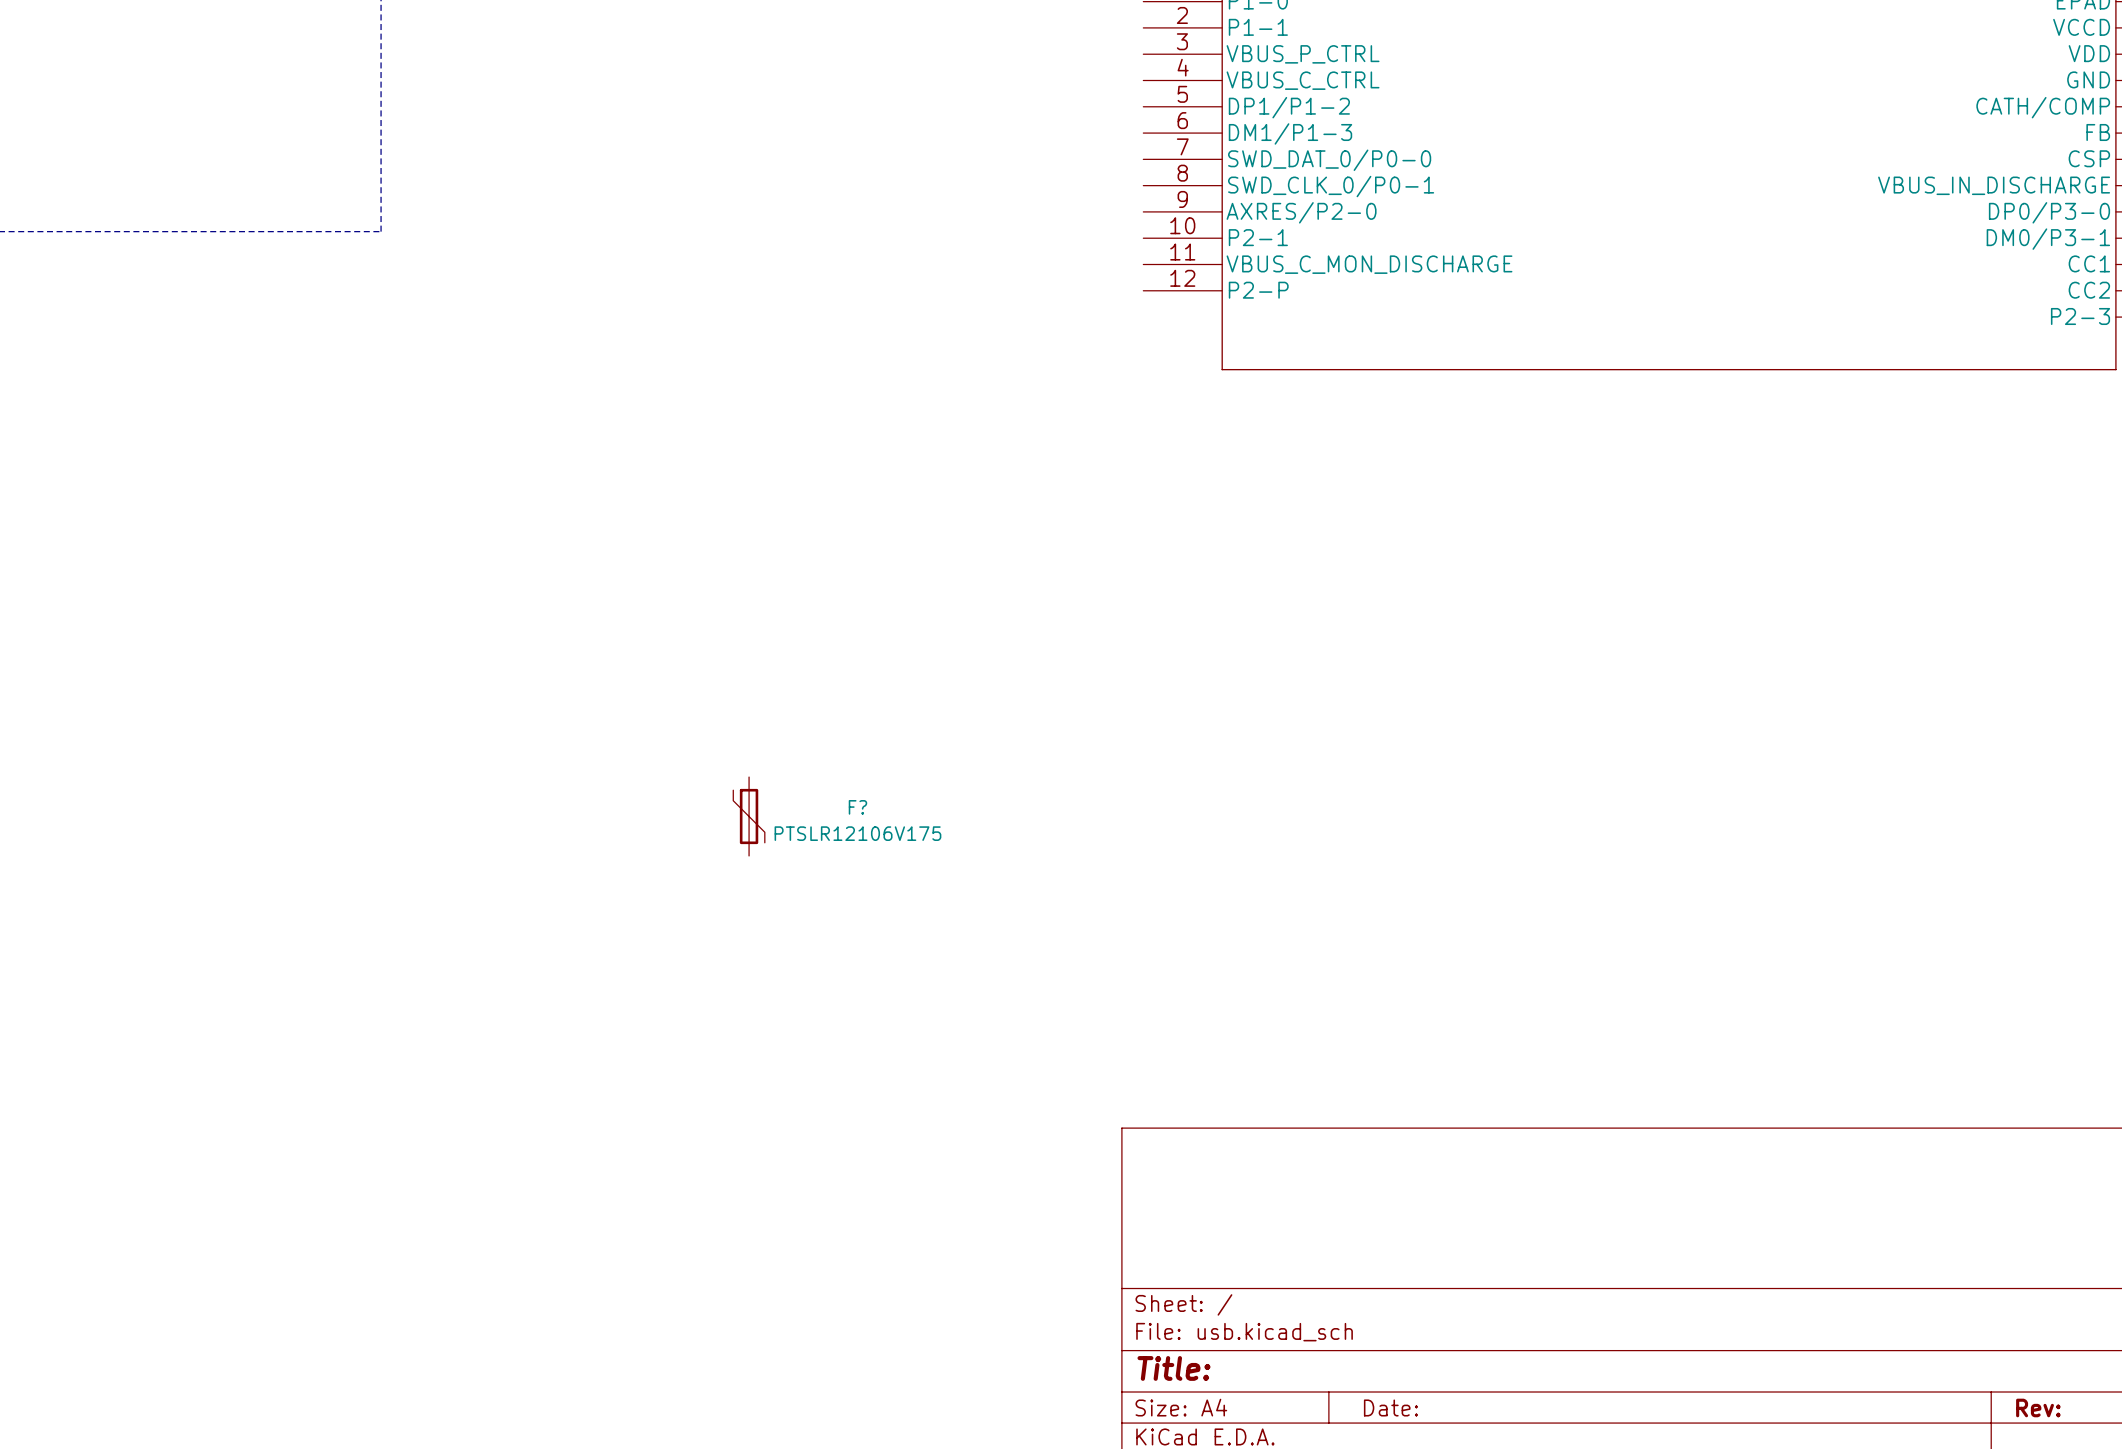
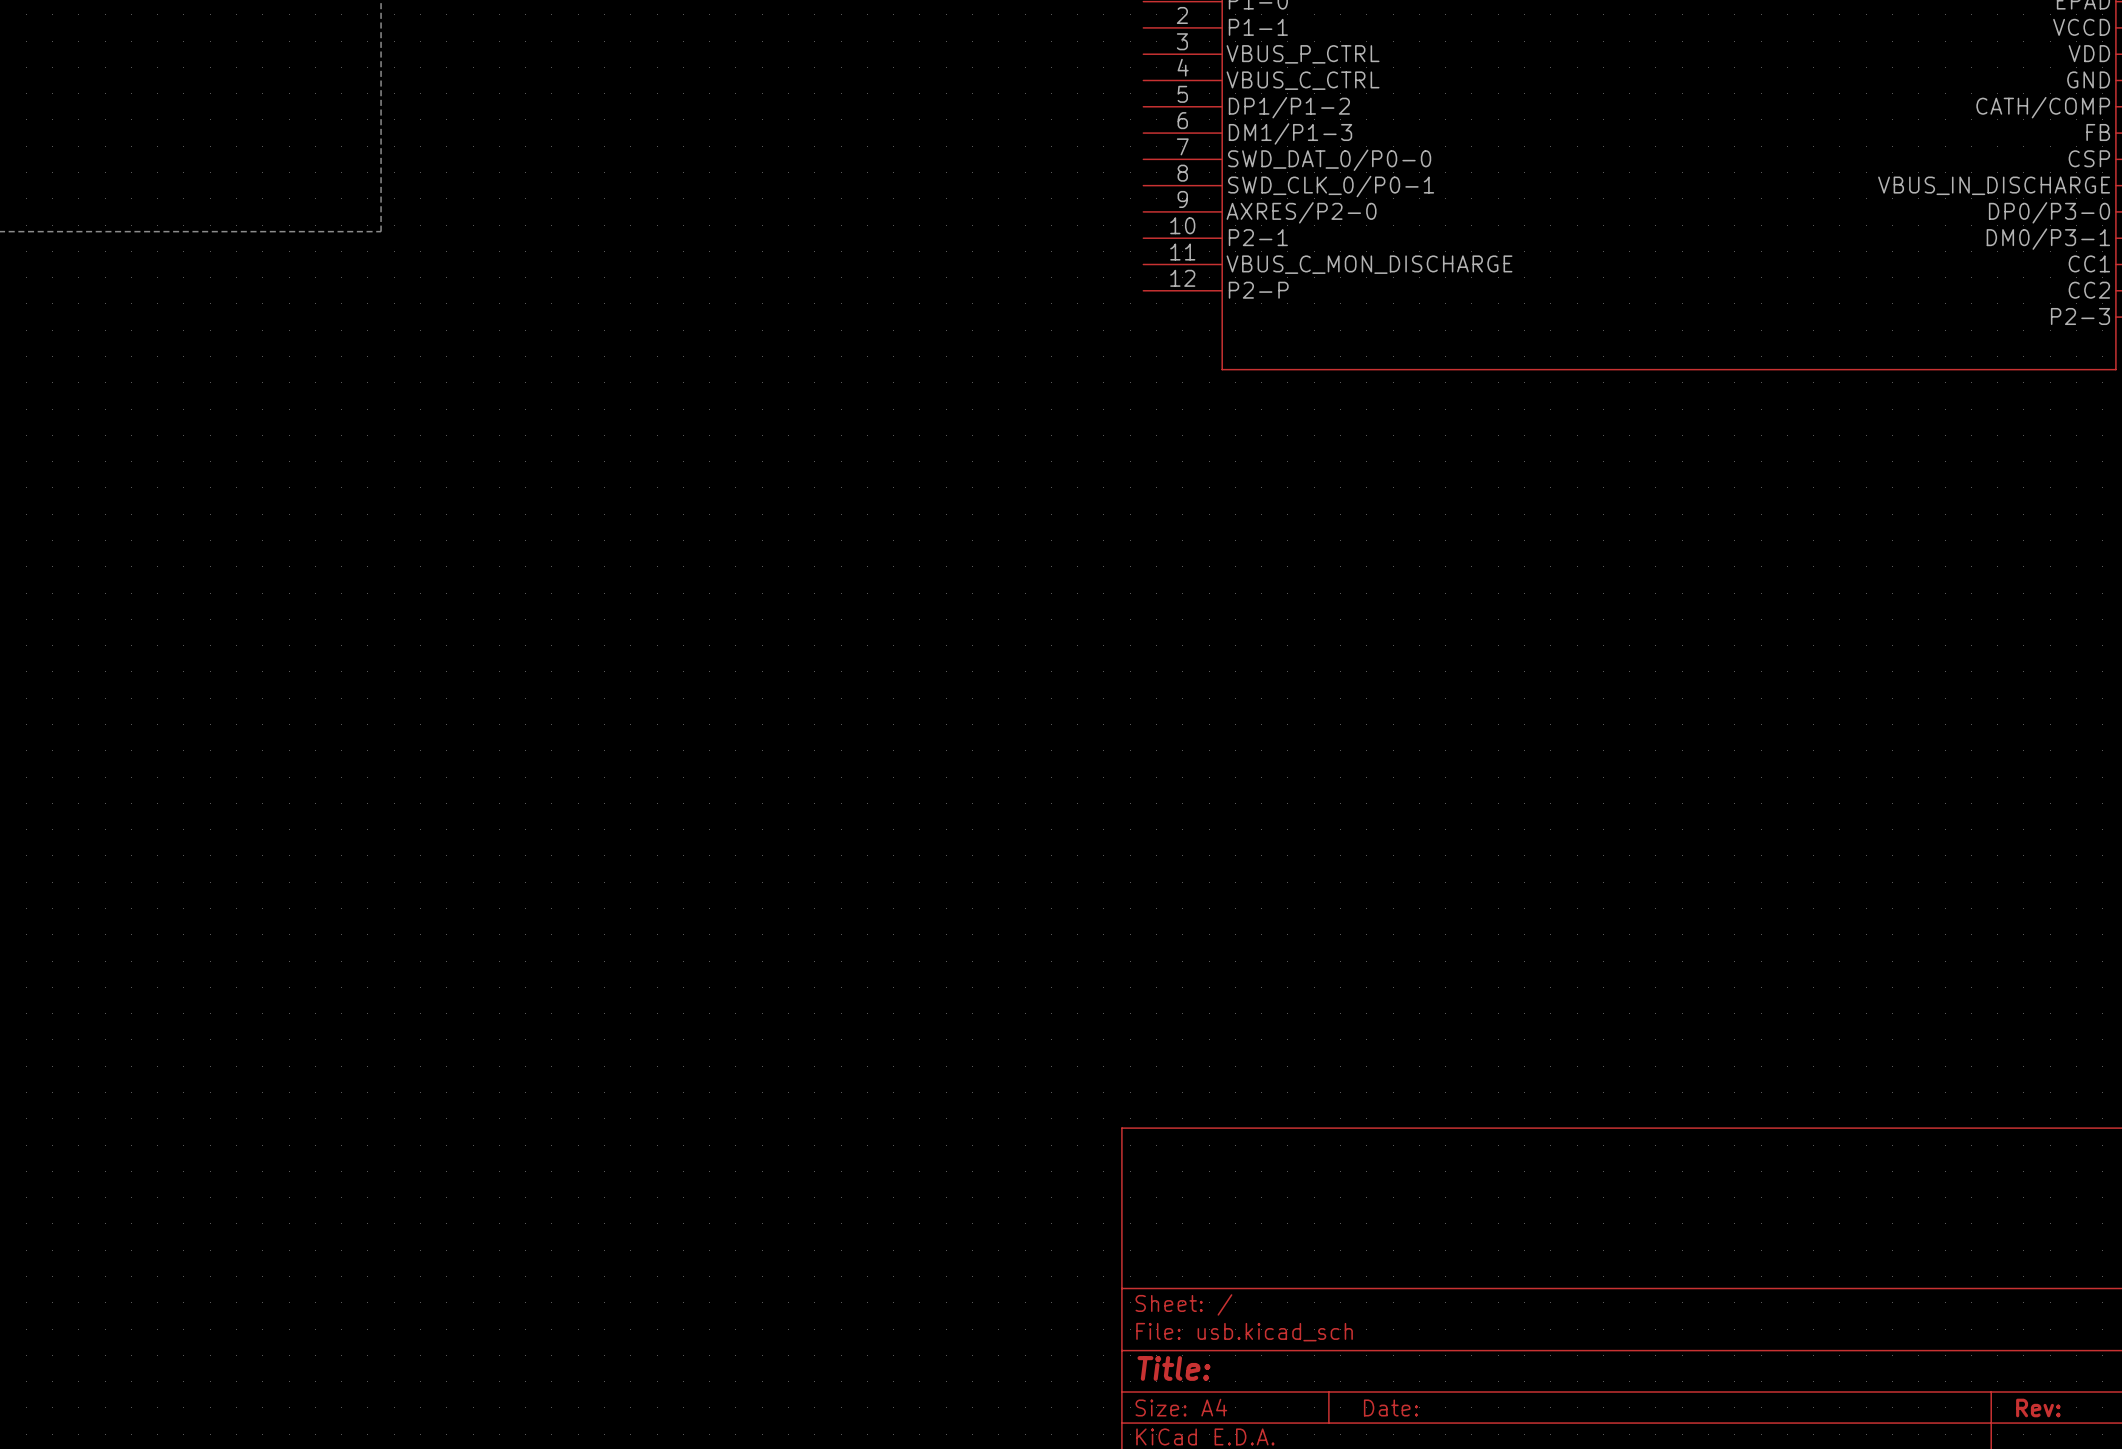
F?: PTSLR12106V175 (749, 816) -> none

